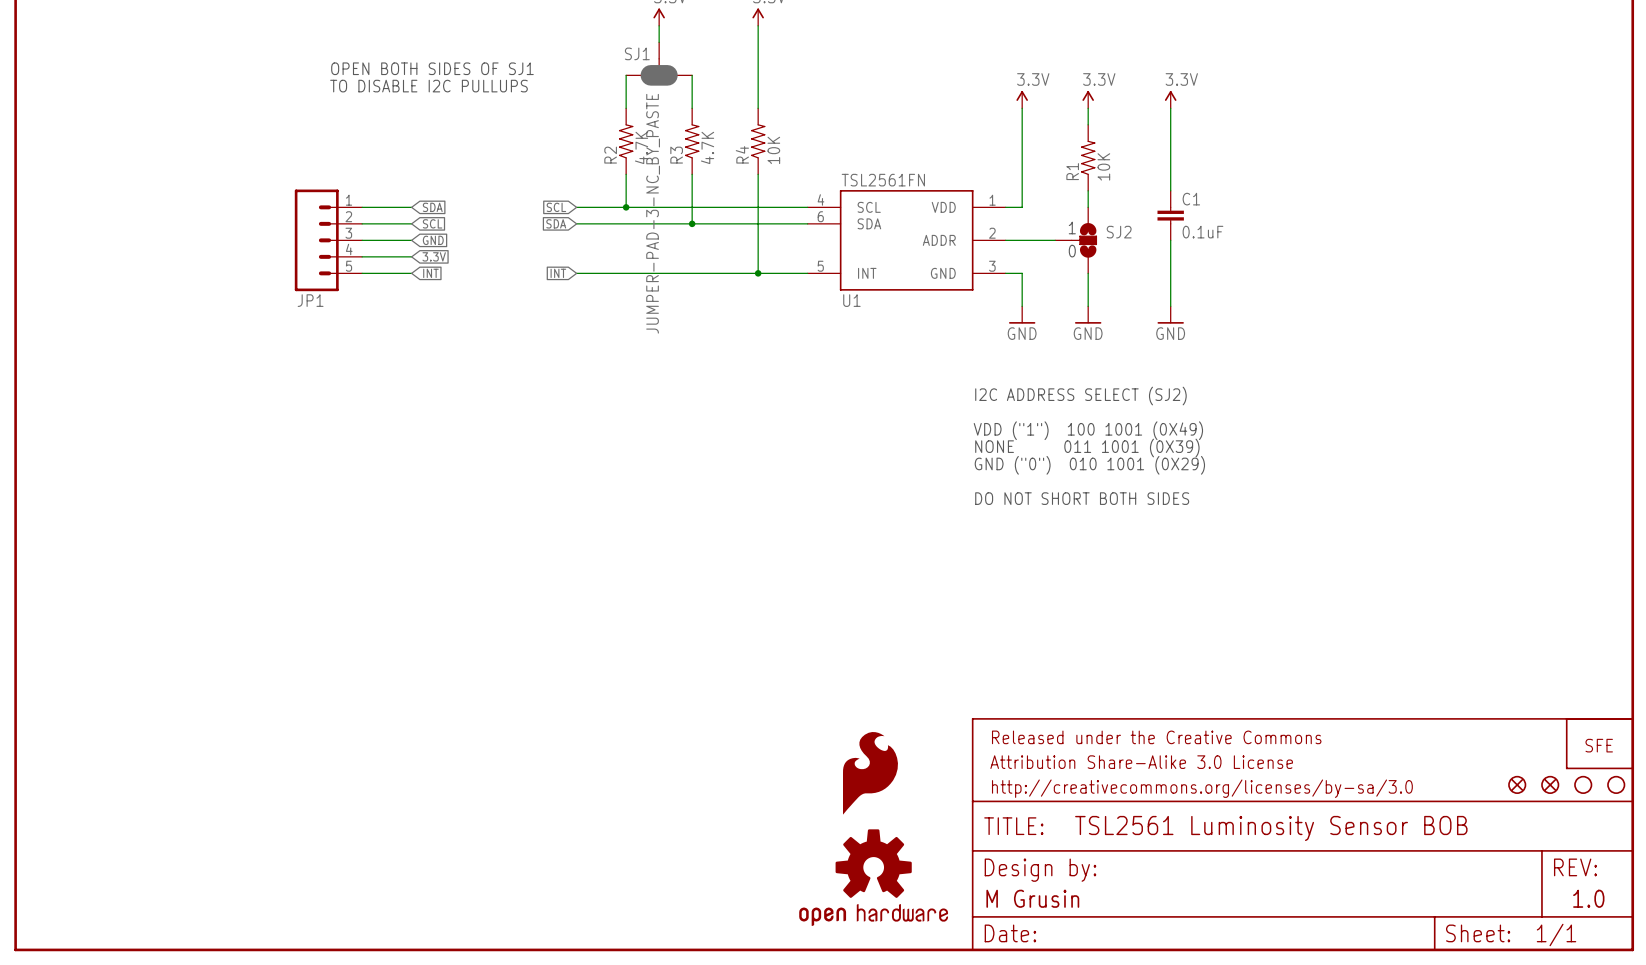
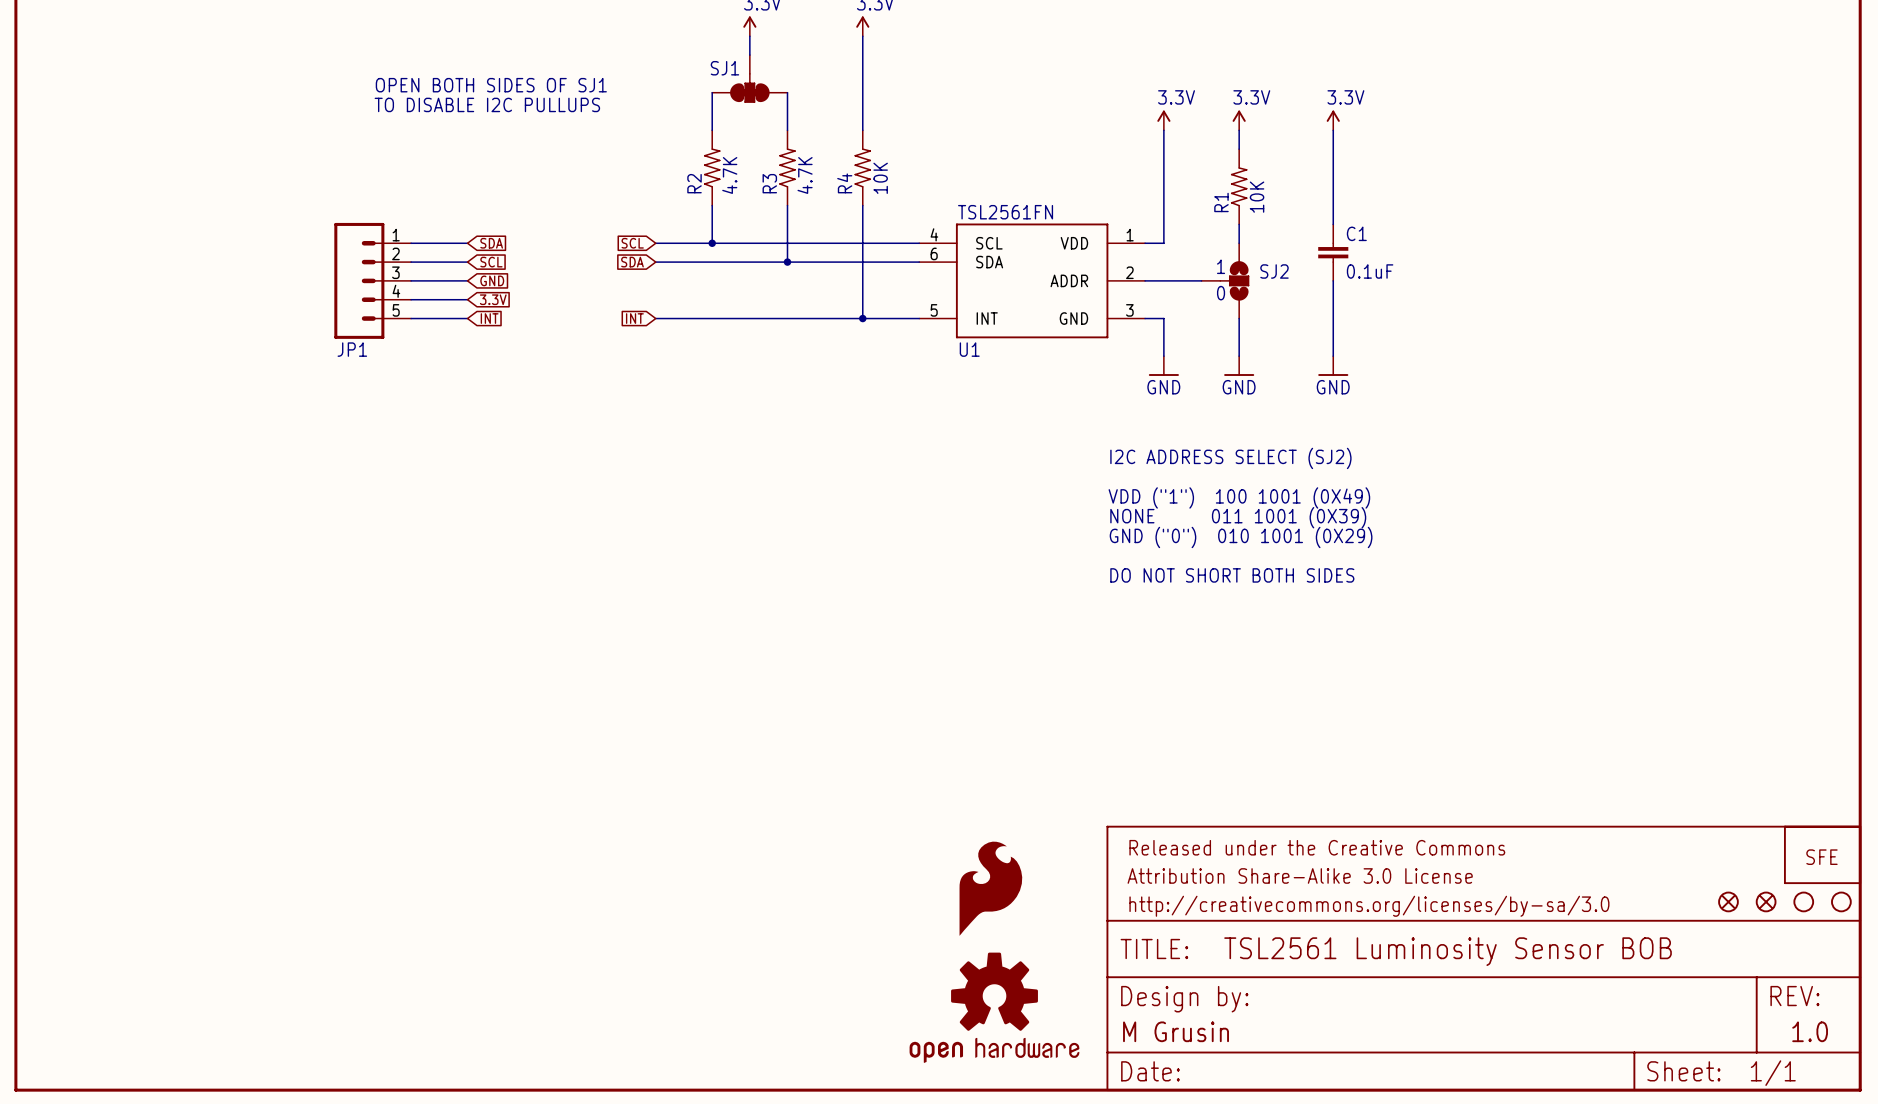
SJ1 symbol: [626, 42, 693, 86] -> [712, 55, 788, 103]
SJ1 value: JUMPER-PAD-3-NC_BY_PASTE (653, 213) -> none

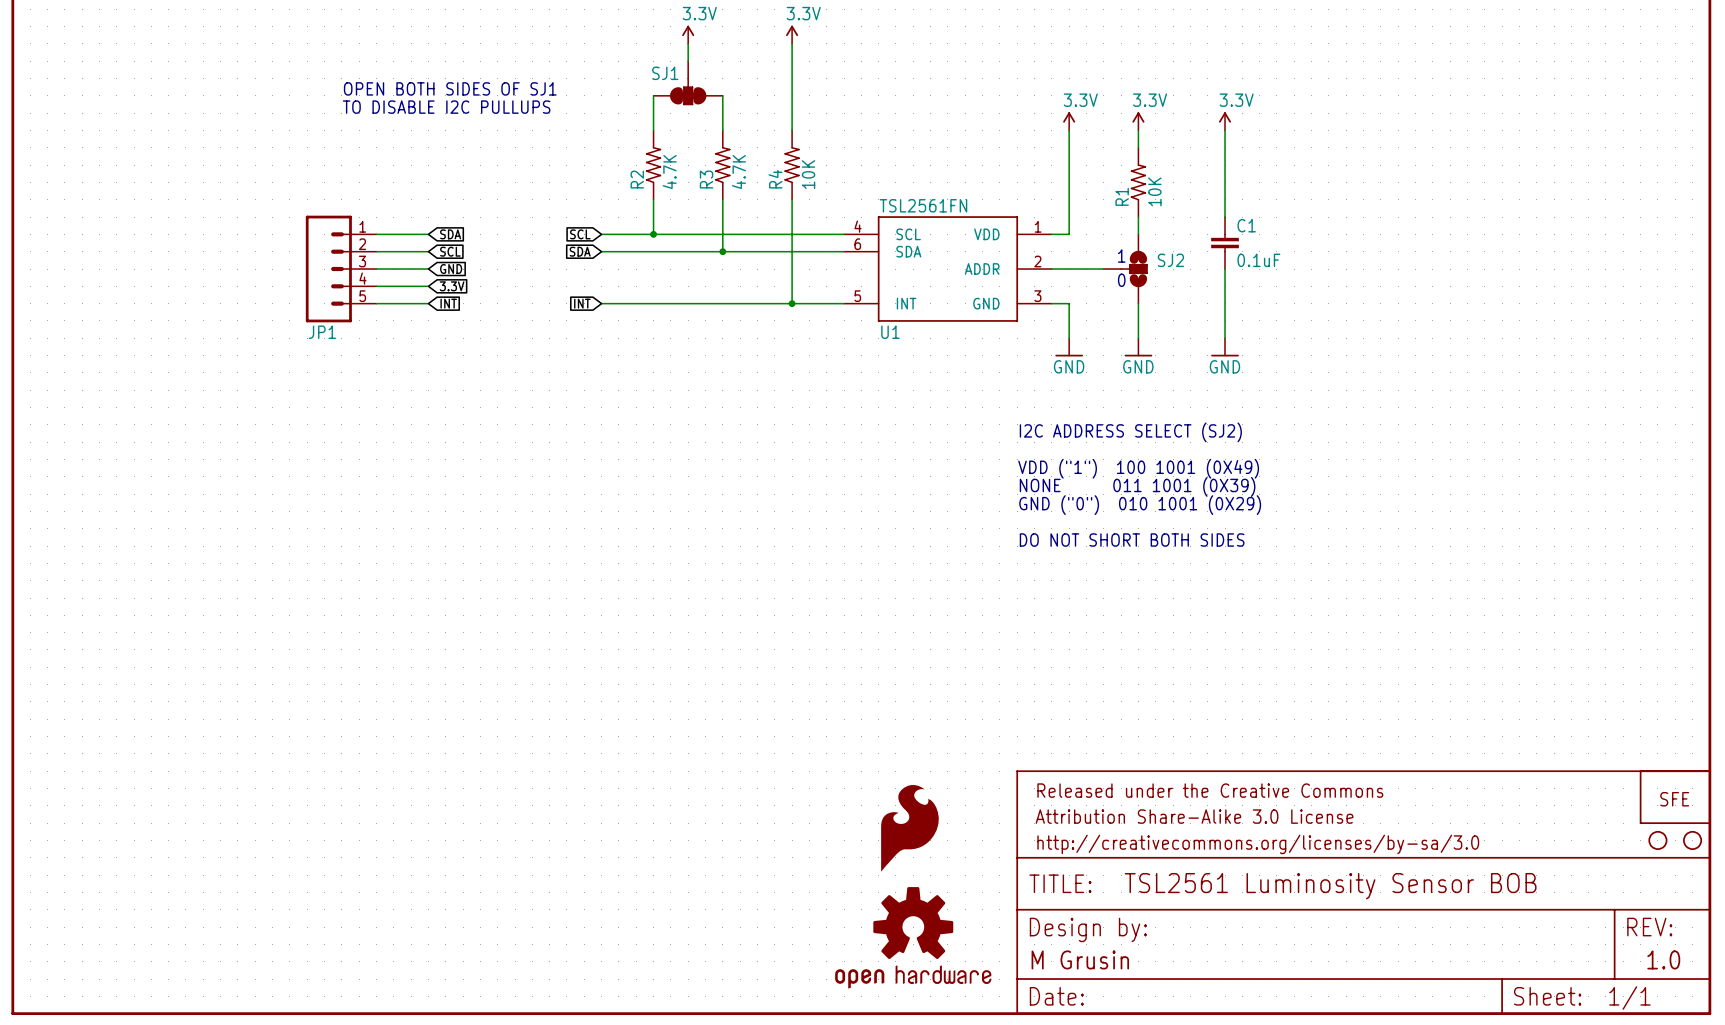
part: (1728, 901) -> none
part: (1766, 901) -> none

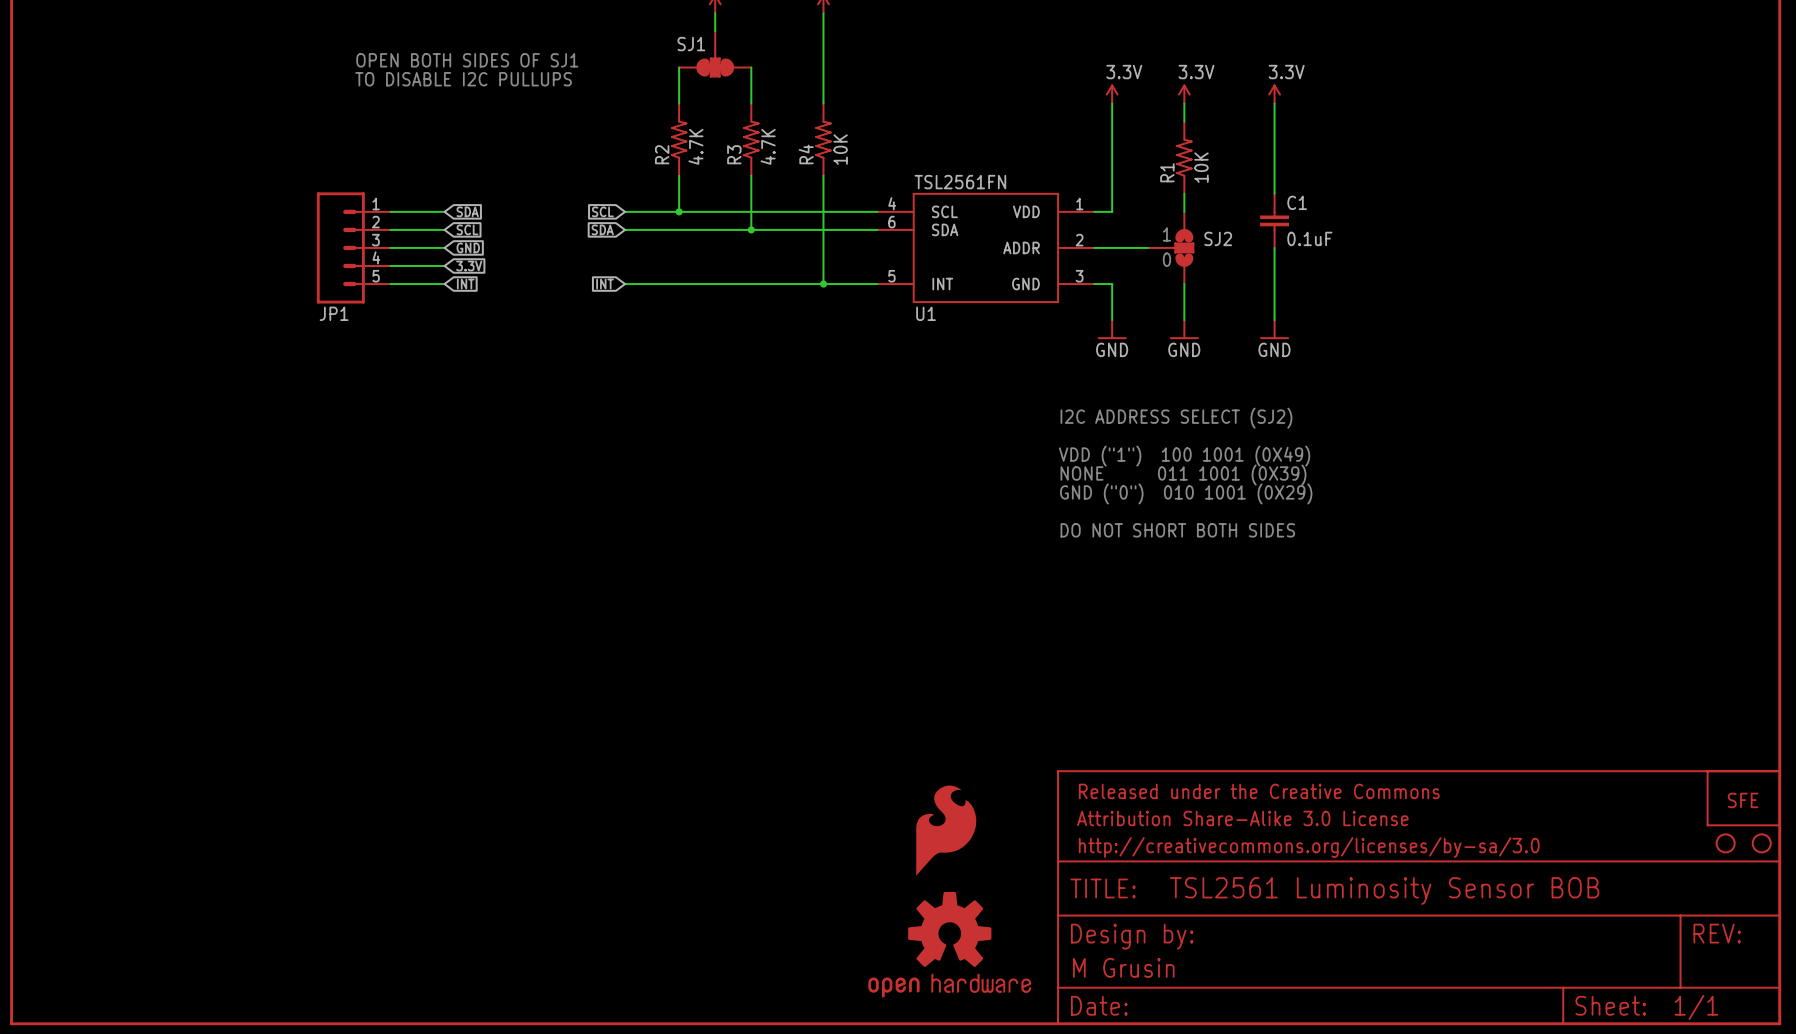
text: 1.0 (1663, 959) -> none

